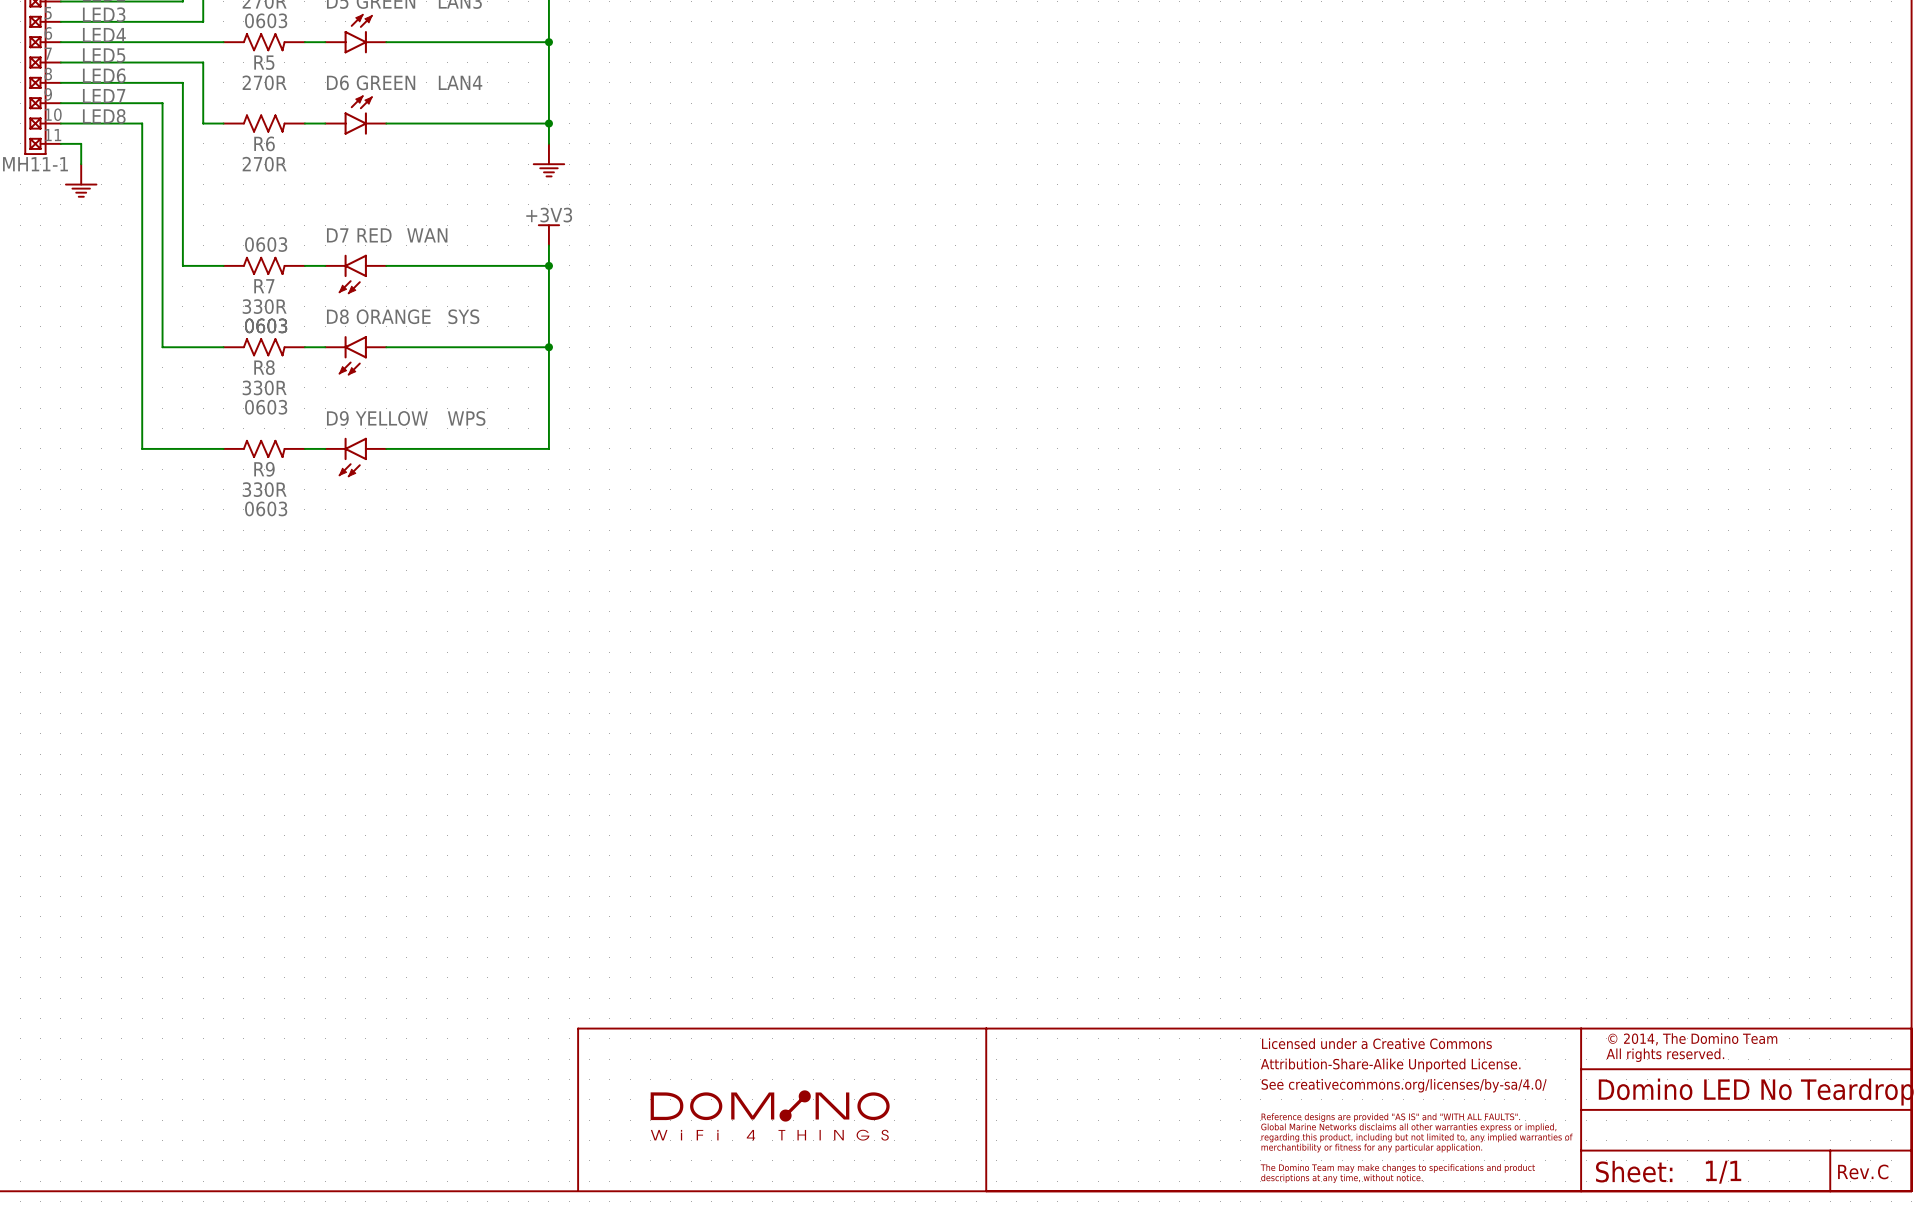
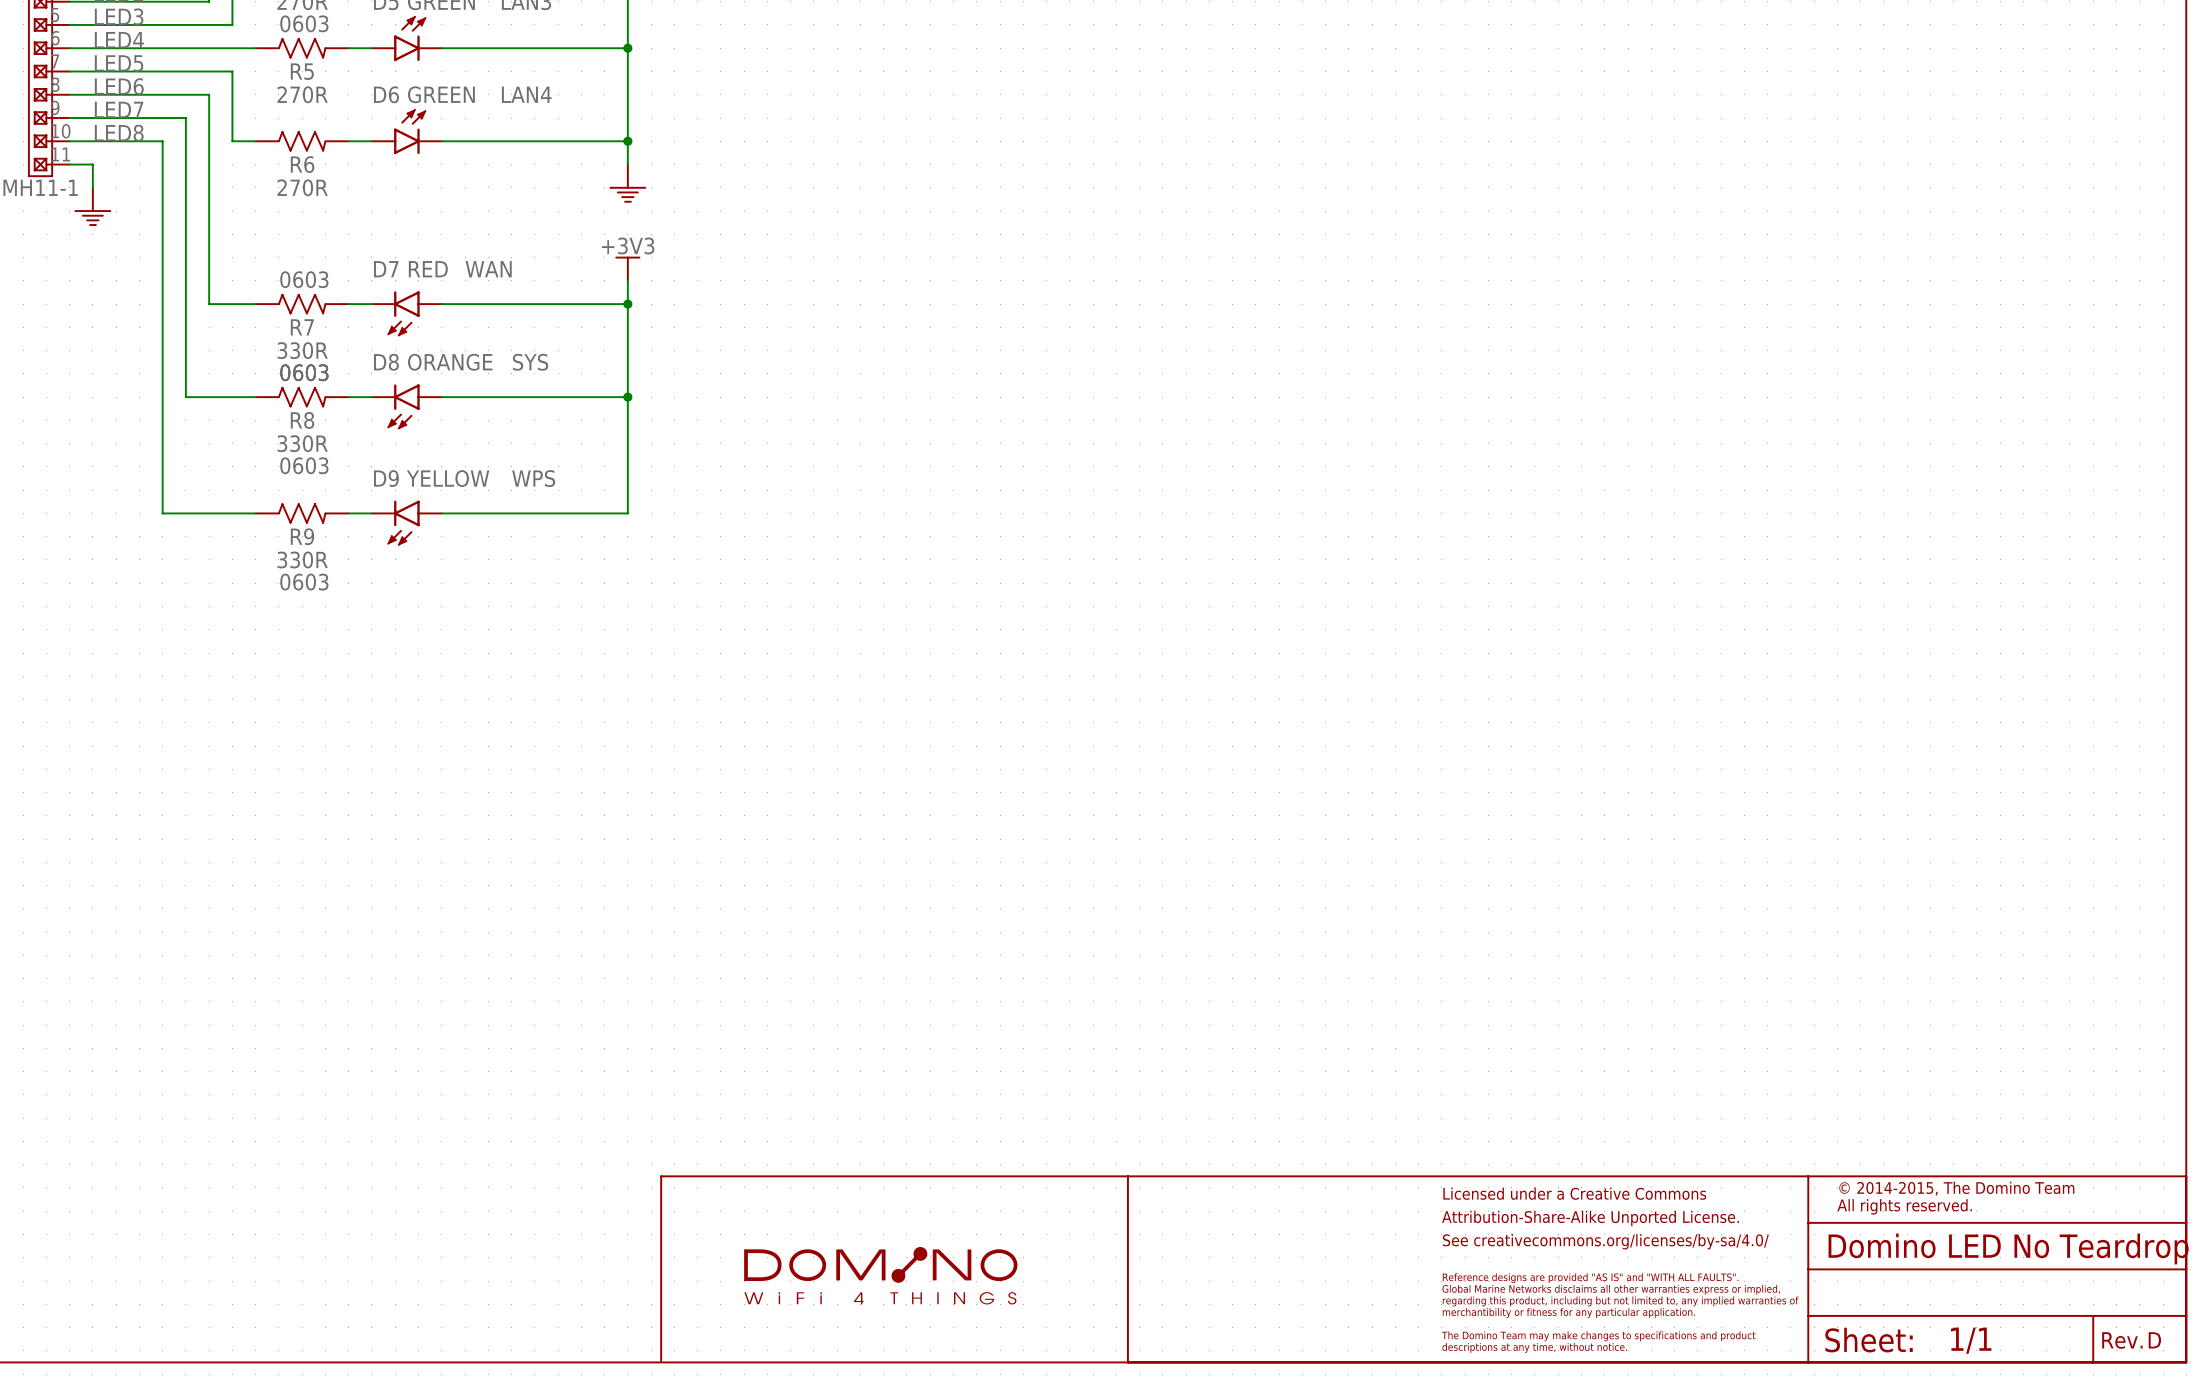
text: © 2014, The Domino Team (1692, 1039) -> © 2014-2015, The Domino Team (1956, 1188)
text: C (1883, 1171) -> D (2154, 1340)

